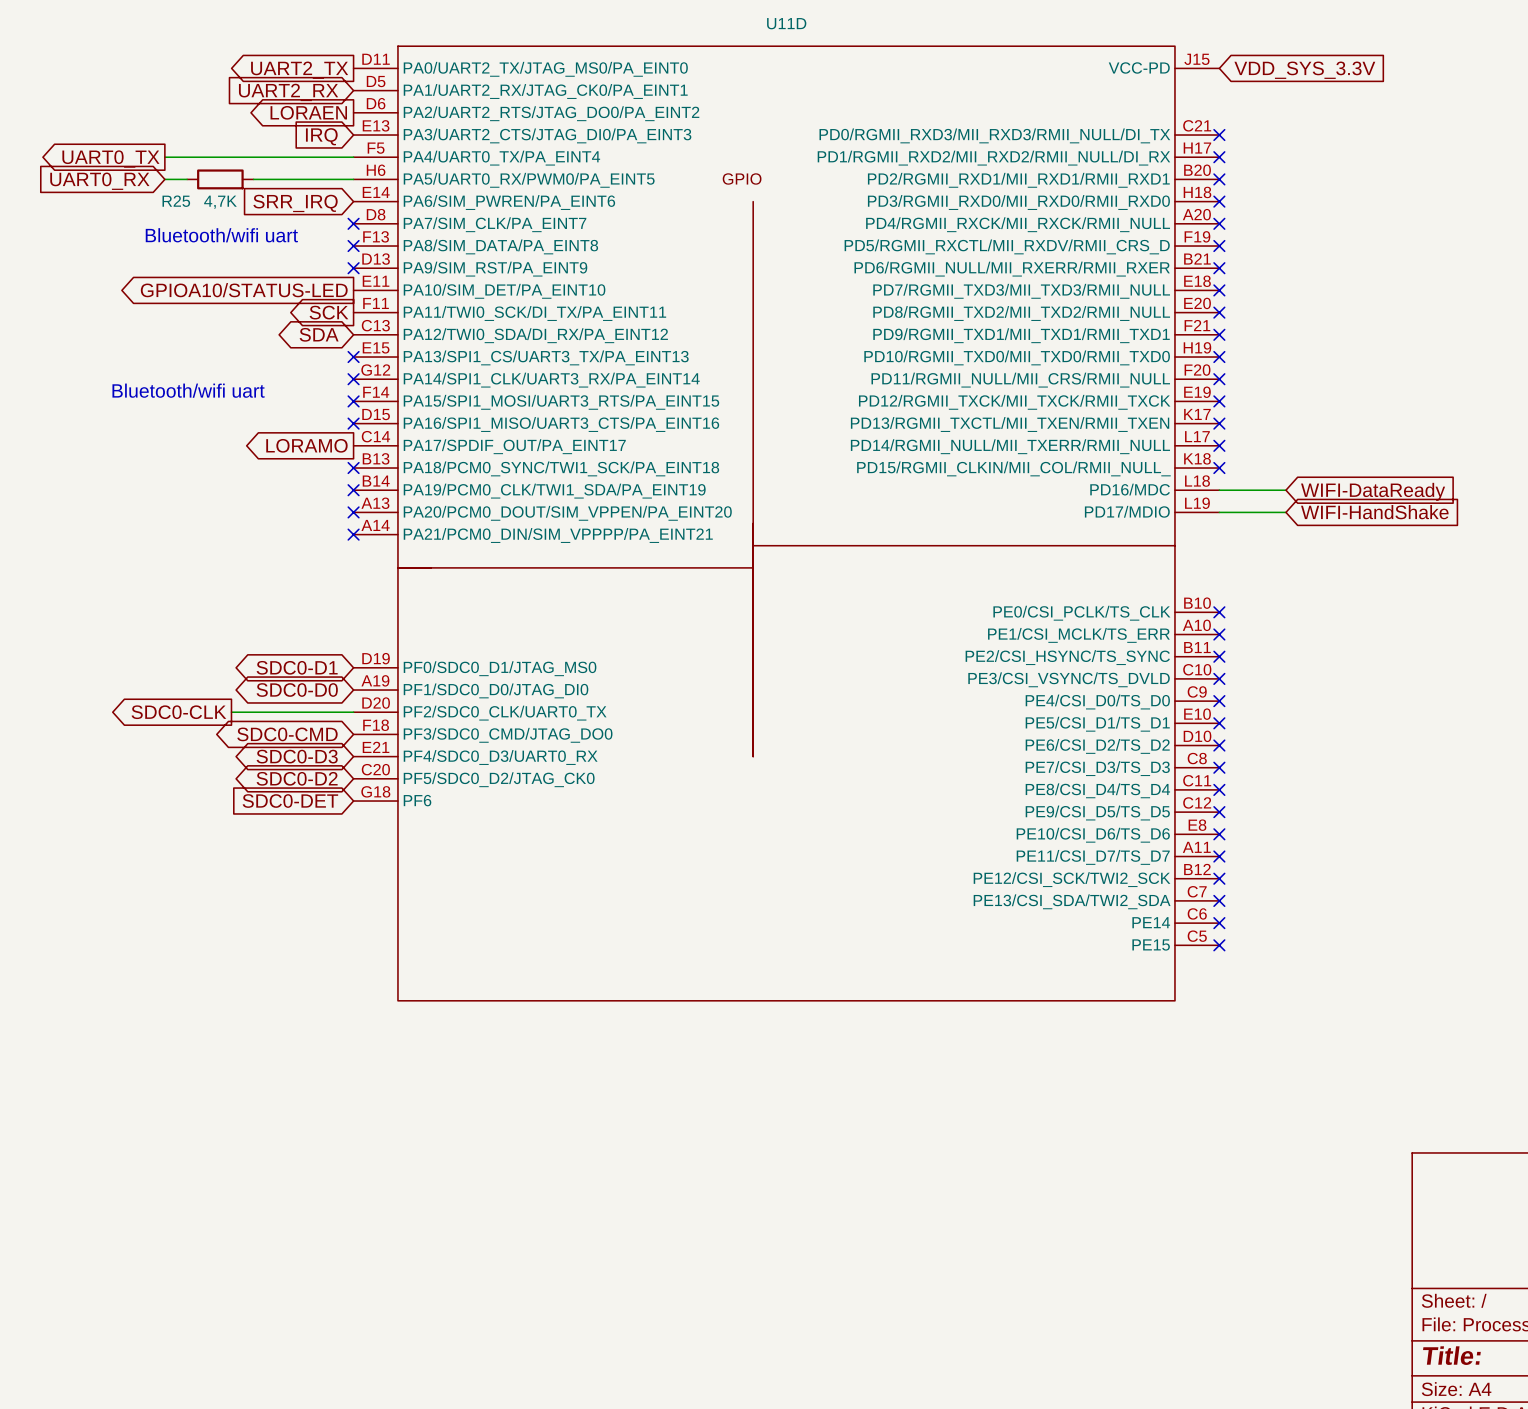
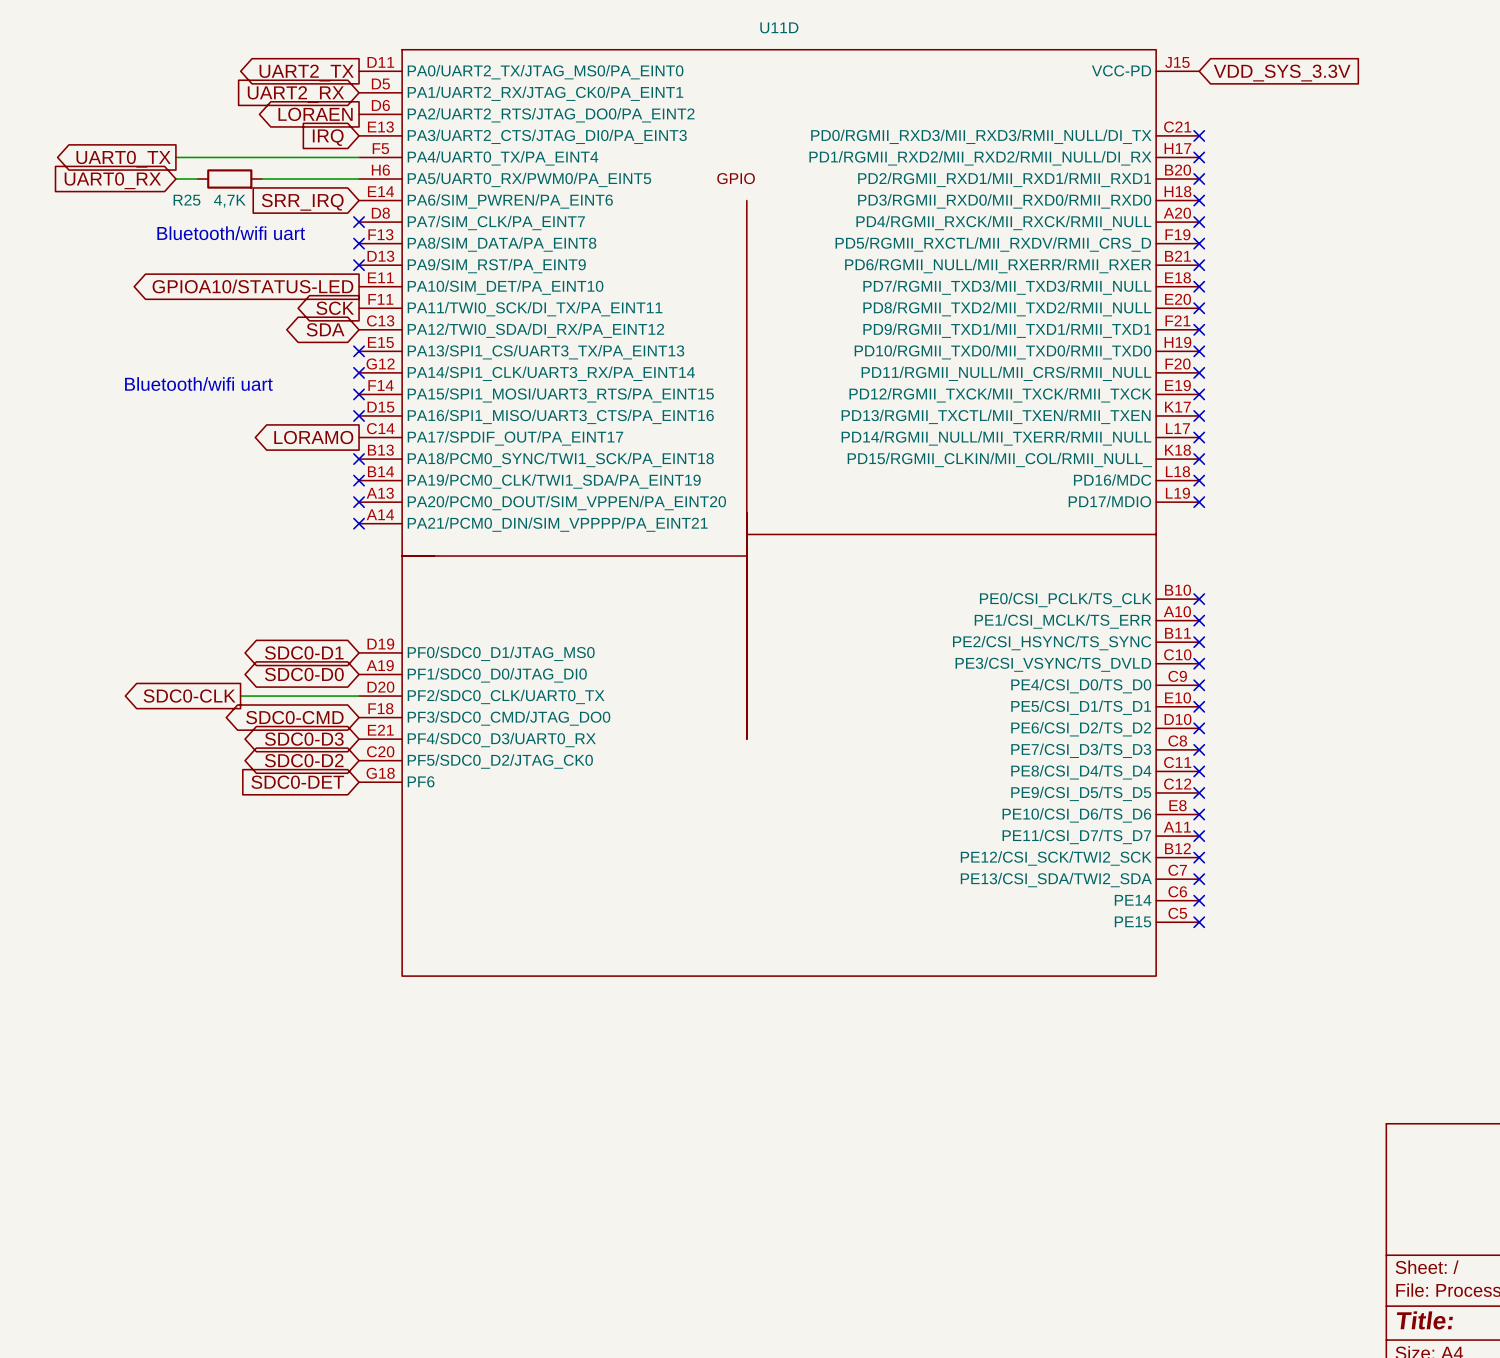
wire: (1219, 490) (1285, 490) -> none
no-connect mark: none -> (1199, 480)
global label: WIFI-DataReady (1373, 491) -> none
wire: (1219, 512) (1285, 512) -> none
no-connect mark: none -> (1199, 502)
global label: WIFI-HandShake (1374, 512) -> none

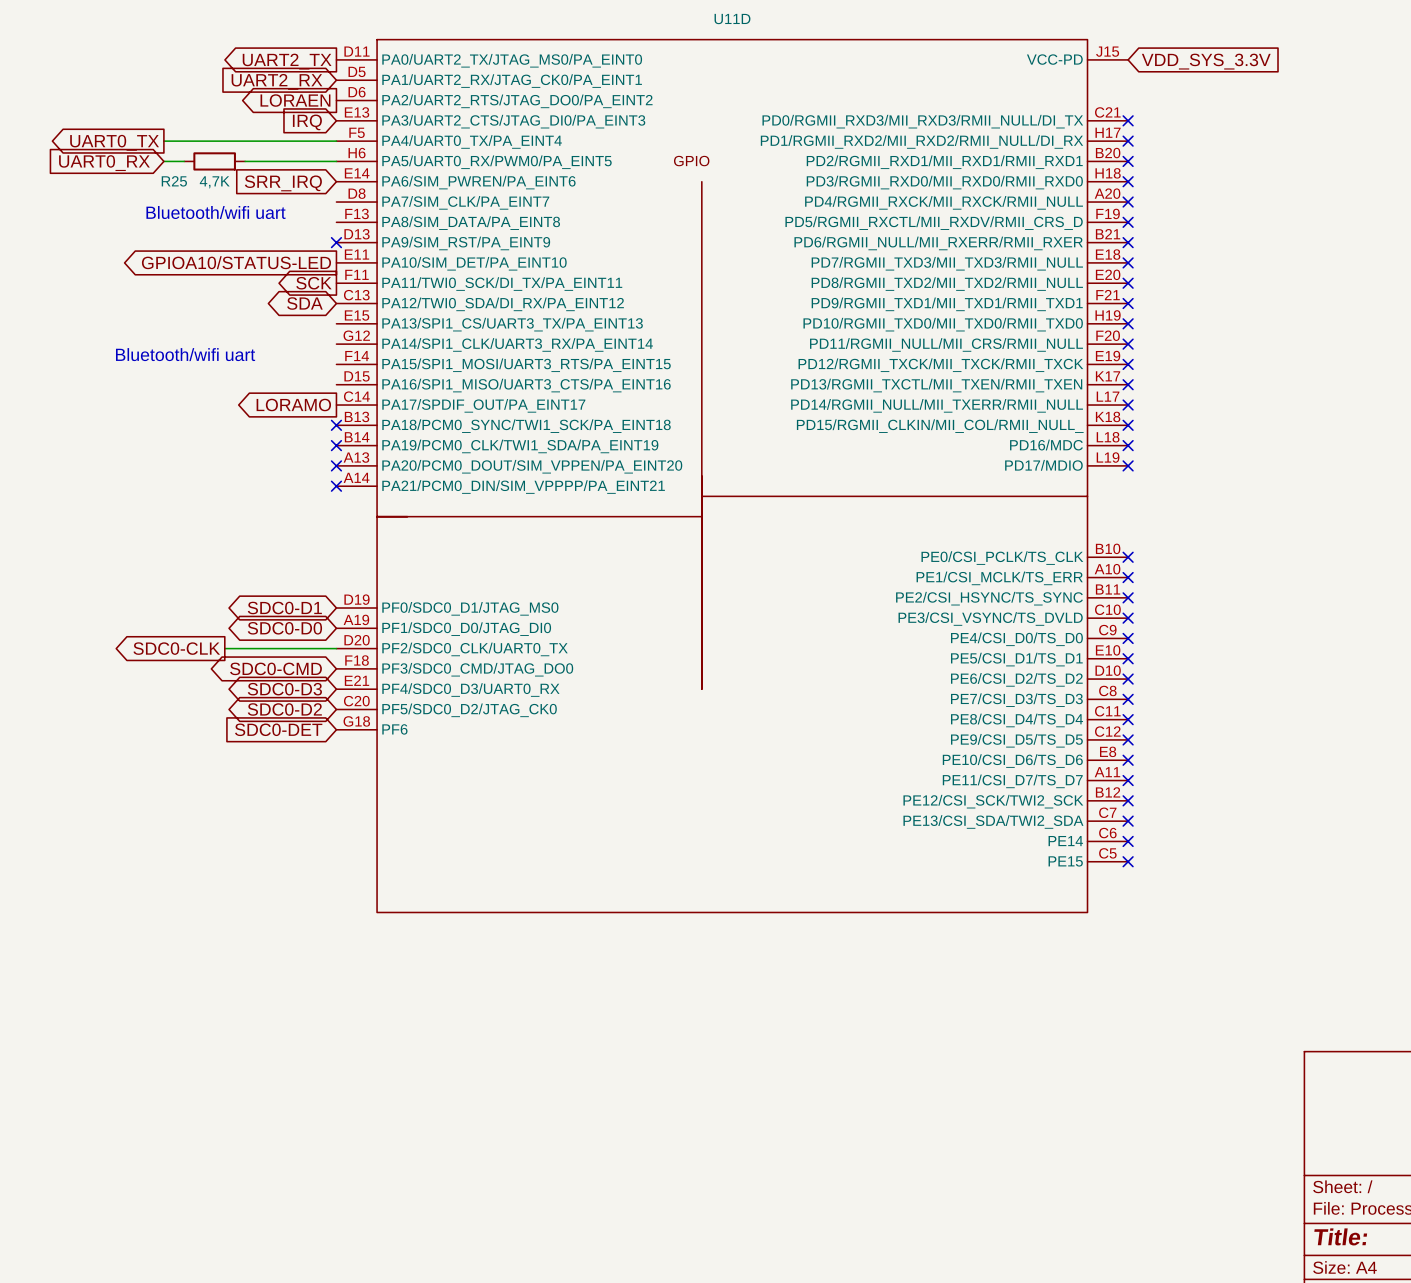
no-connect mark: (359, 222) -> none
no-connect mark: (359, 243) -> none
no-connect mark: (359, 351) -> none
no-connect mark: (359, 372) -> none
no-connect mark: (359, 394) -> none
no-connect mark: (359, 415) -> none

